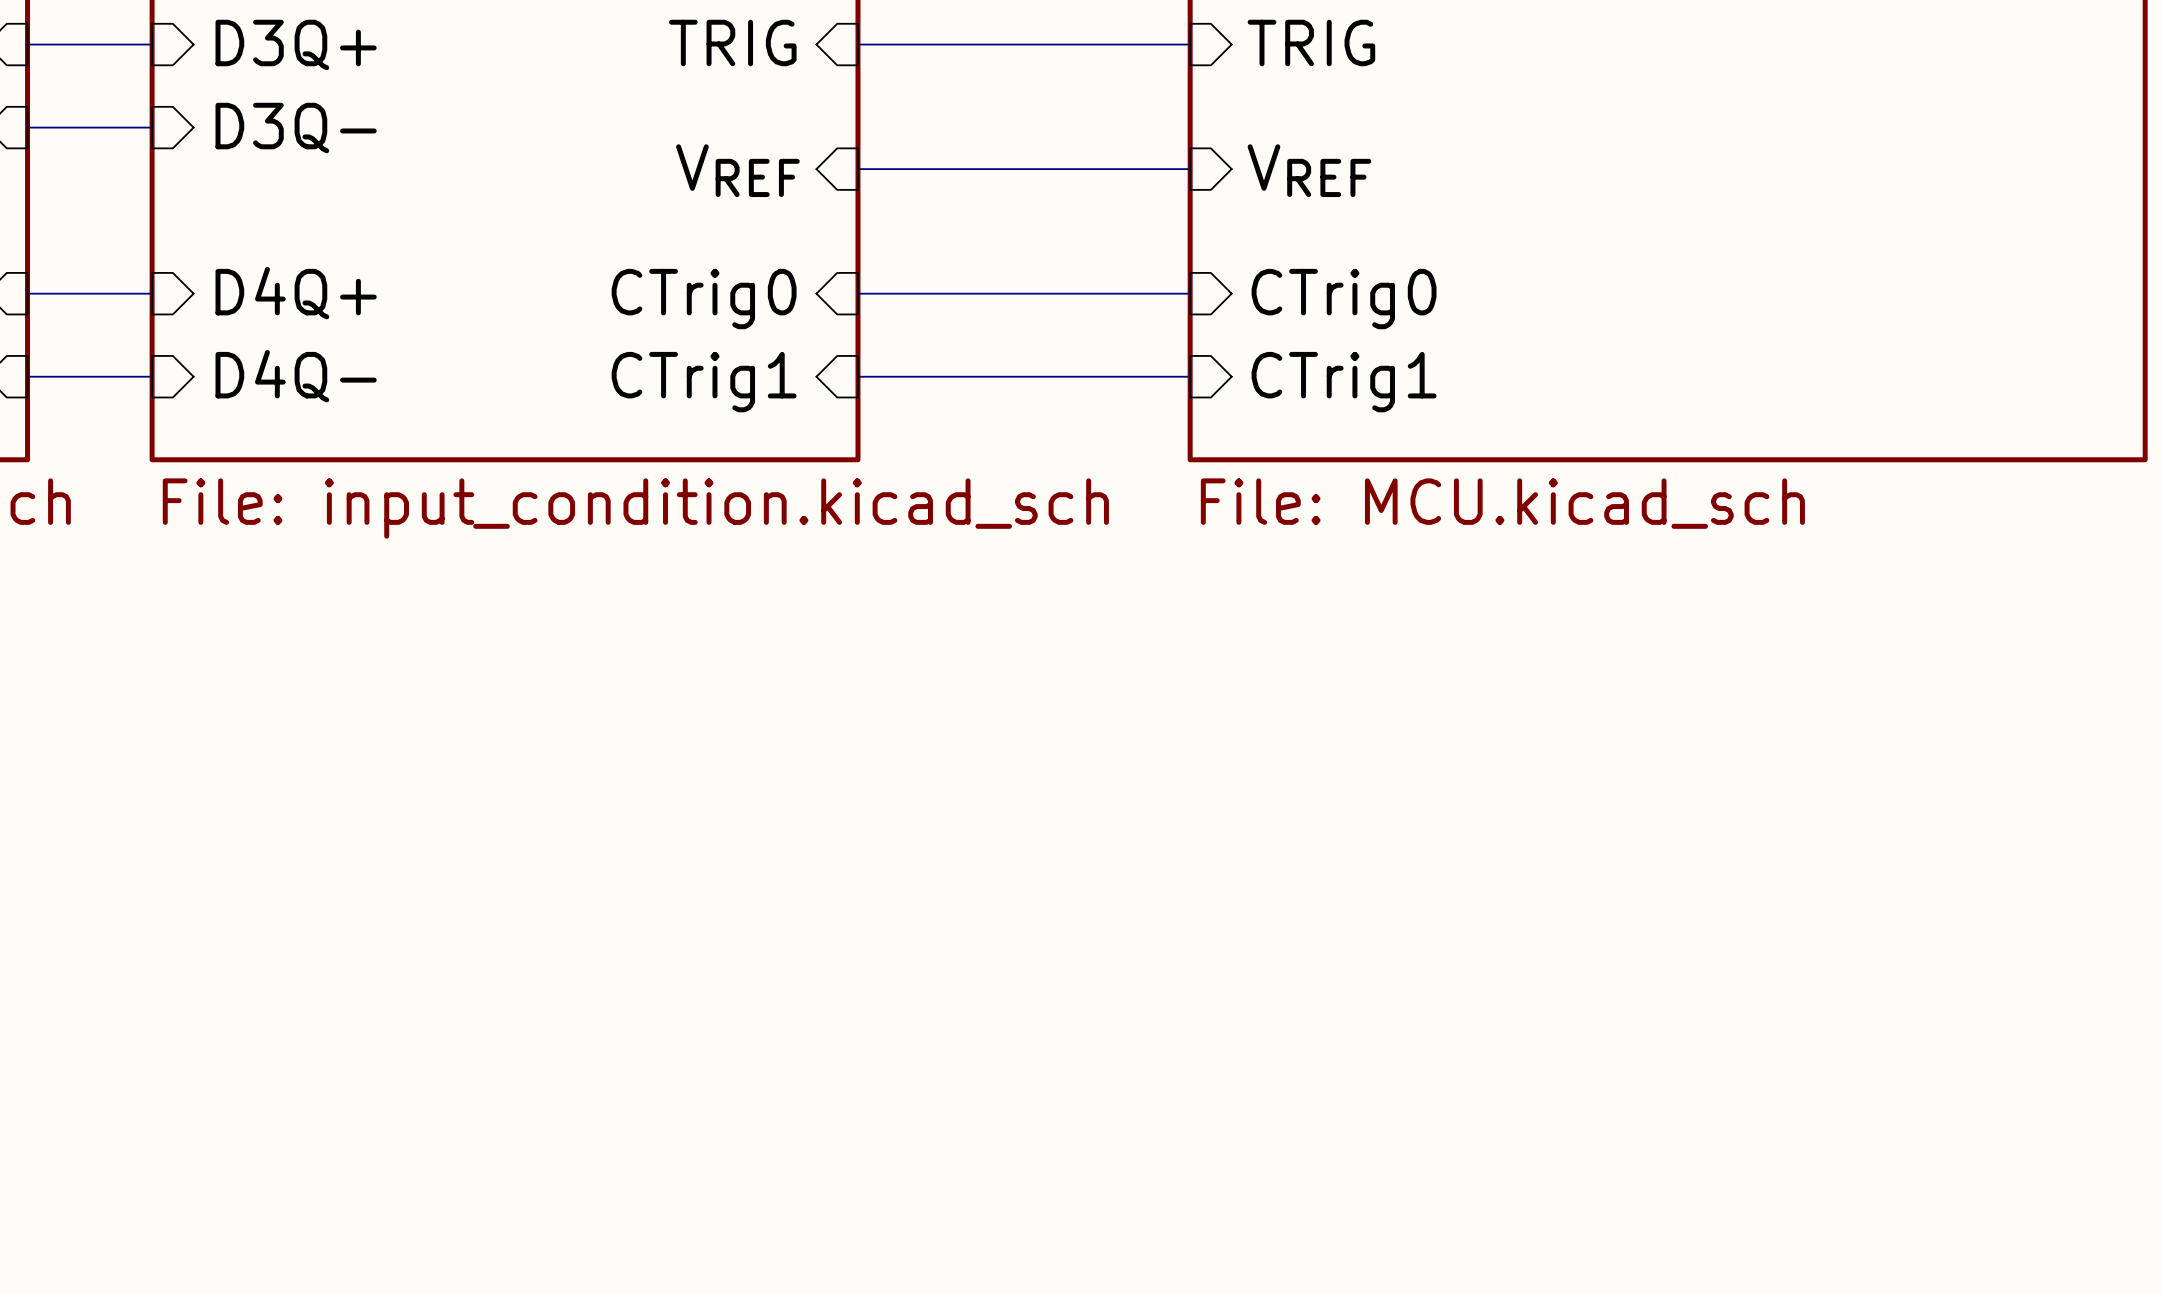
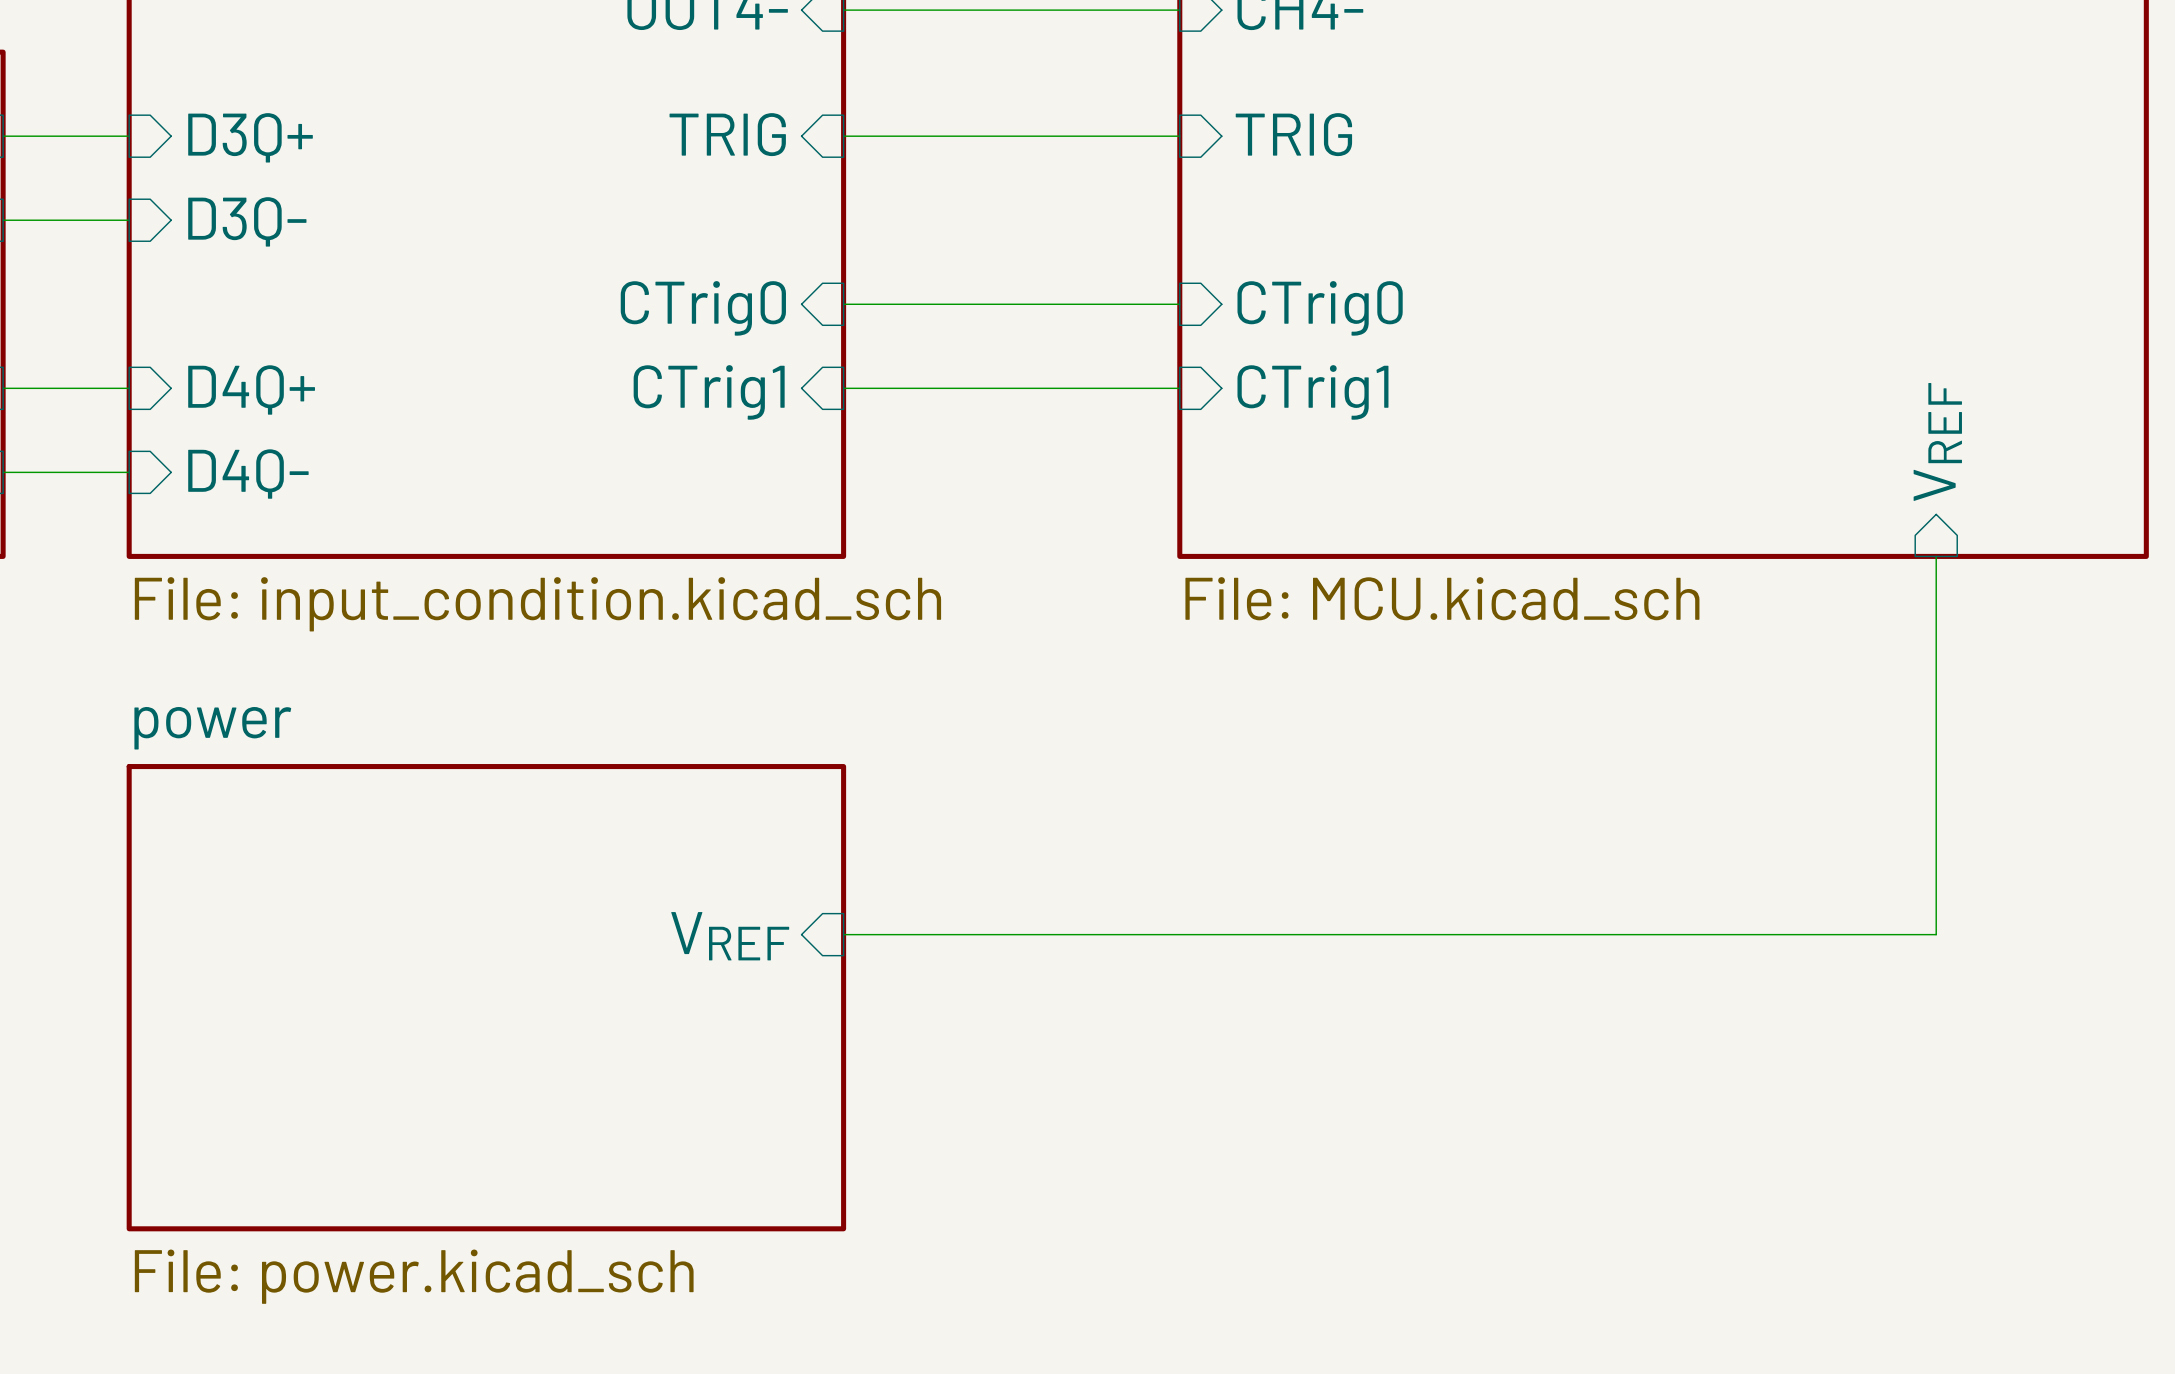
wire: (857, 169) (1190, 169) -> (843, 304) (1179, 304)
sheet pin: VREF (737, 170) -> none
sheet pin: VREF (1309, 170) -> none
sheet pin: none -> CTrig0 (703, 308)
sheet pin: none -> CTrig0 (1320, 308)
sheet pin: CTrig0 (704, 299) -> CTrig1 (709, 392)
sheet pin: CTrig0 (1344, 299) -> CTrig1 (1312, 392)
sheet pin: none -> VREF (1937, 441)
wire: (857, 376) (1190, 376) -> none
sheet pin: CTrig1 (704, 382) -> none
sheet pin: CTrig1 (1344, 382) -> none
wire: none -> (1936, 556) (1936, 934) (843, 934)
sheet pin: none -> VREF (730, 936)
sheet power: none -> File: power.kicad_sch (486, 997)

